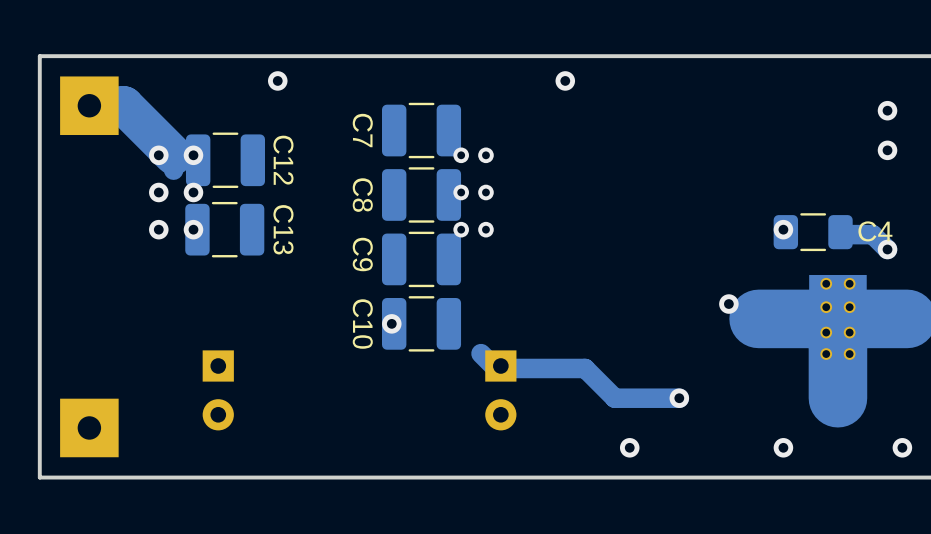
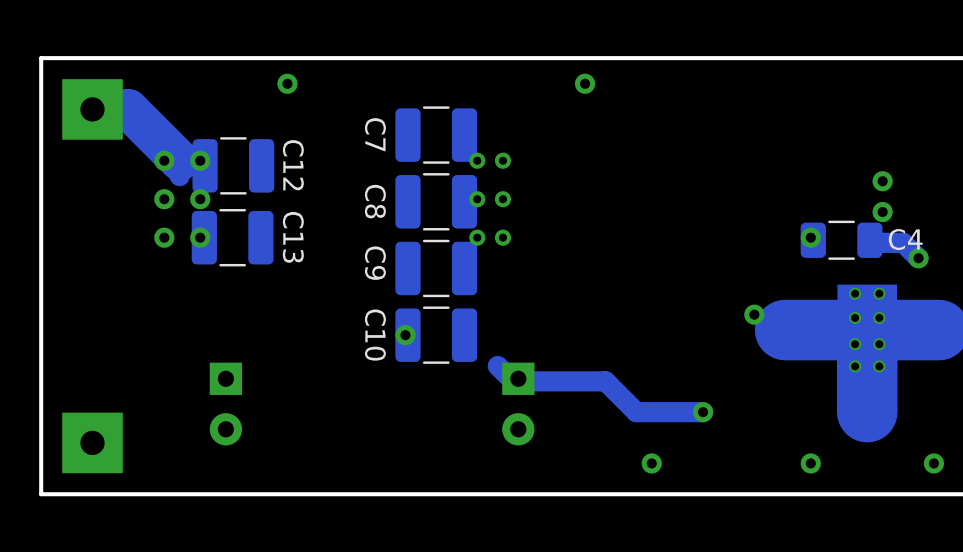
via: (887, 110) -> none
via: (887, 150) -> none
via: none -> (882, 181)
via: none -> (882, 212)

